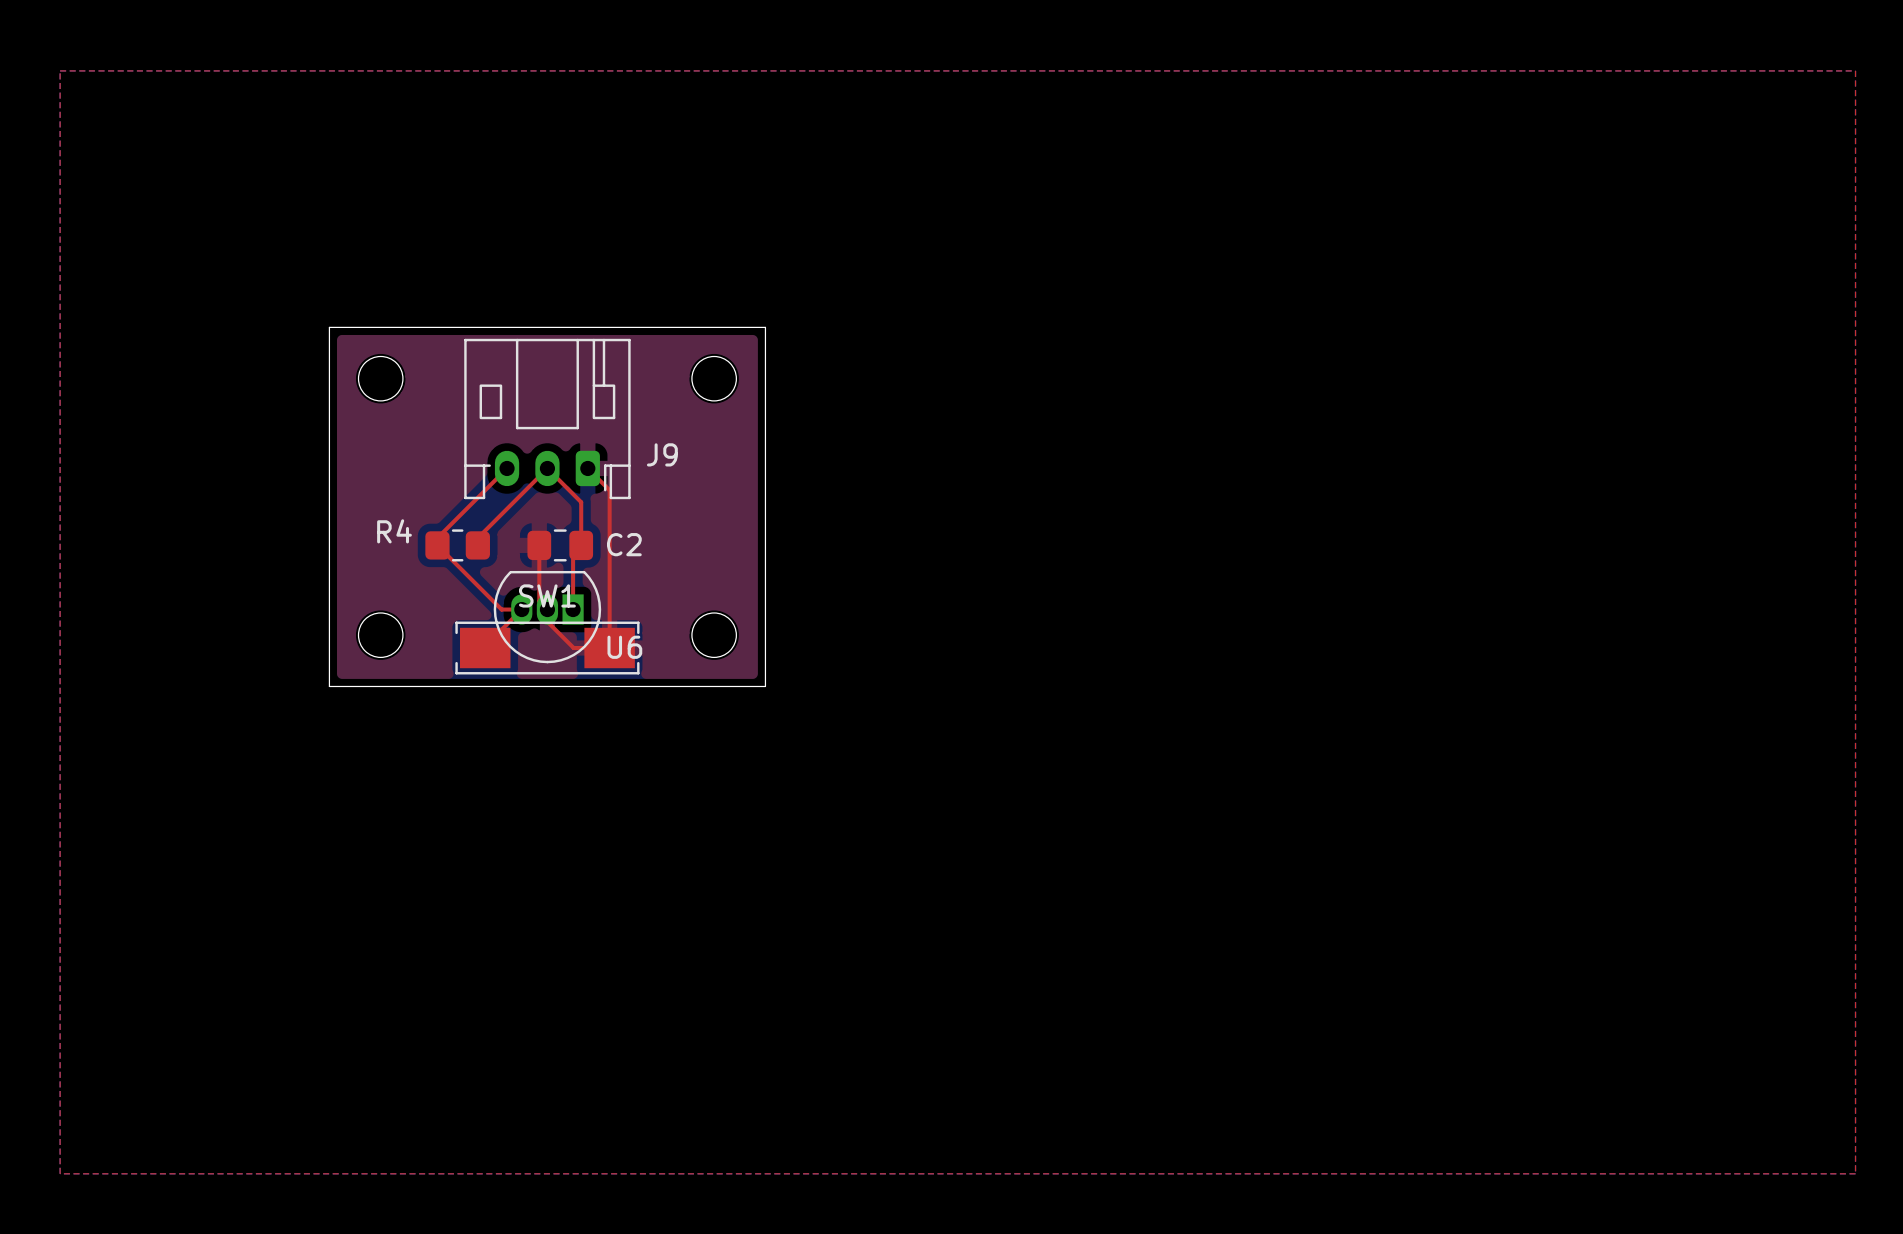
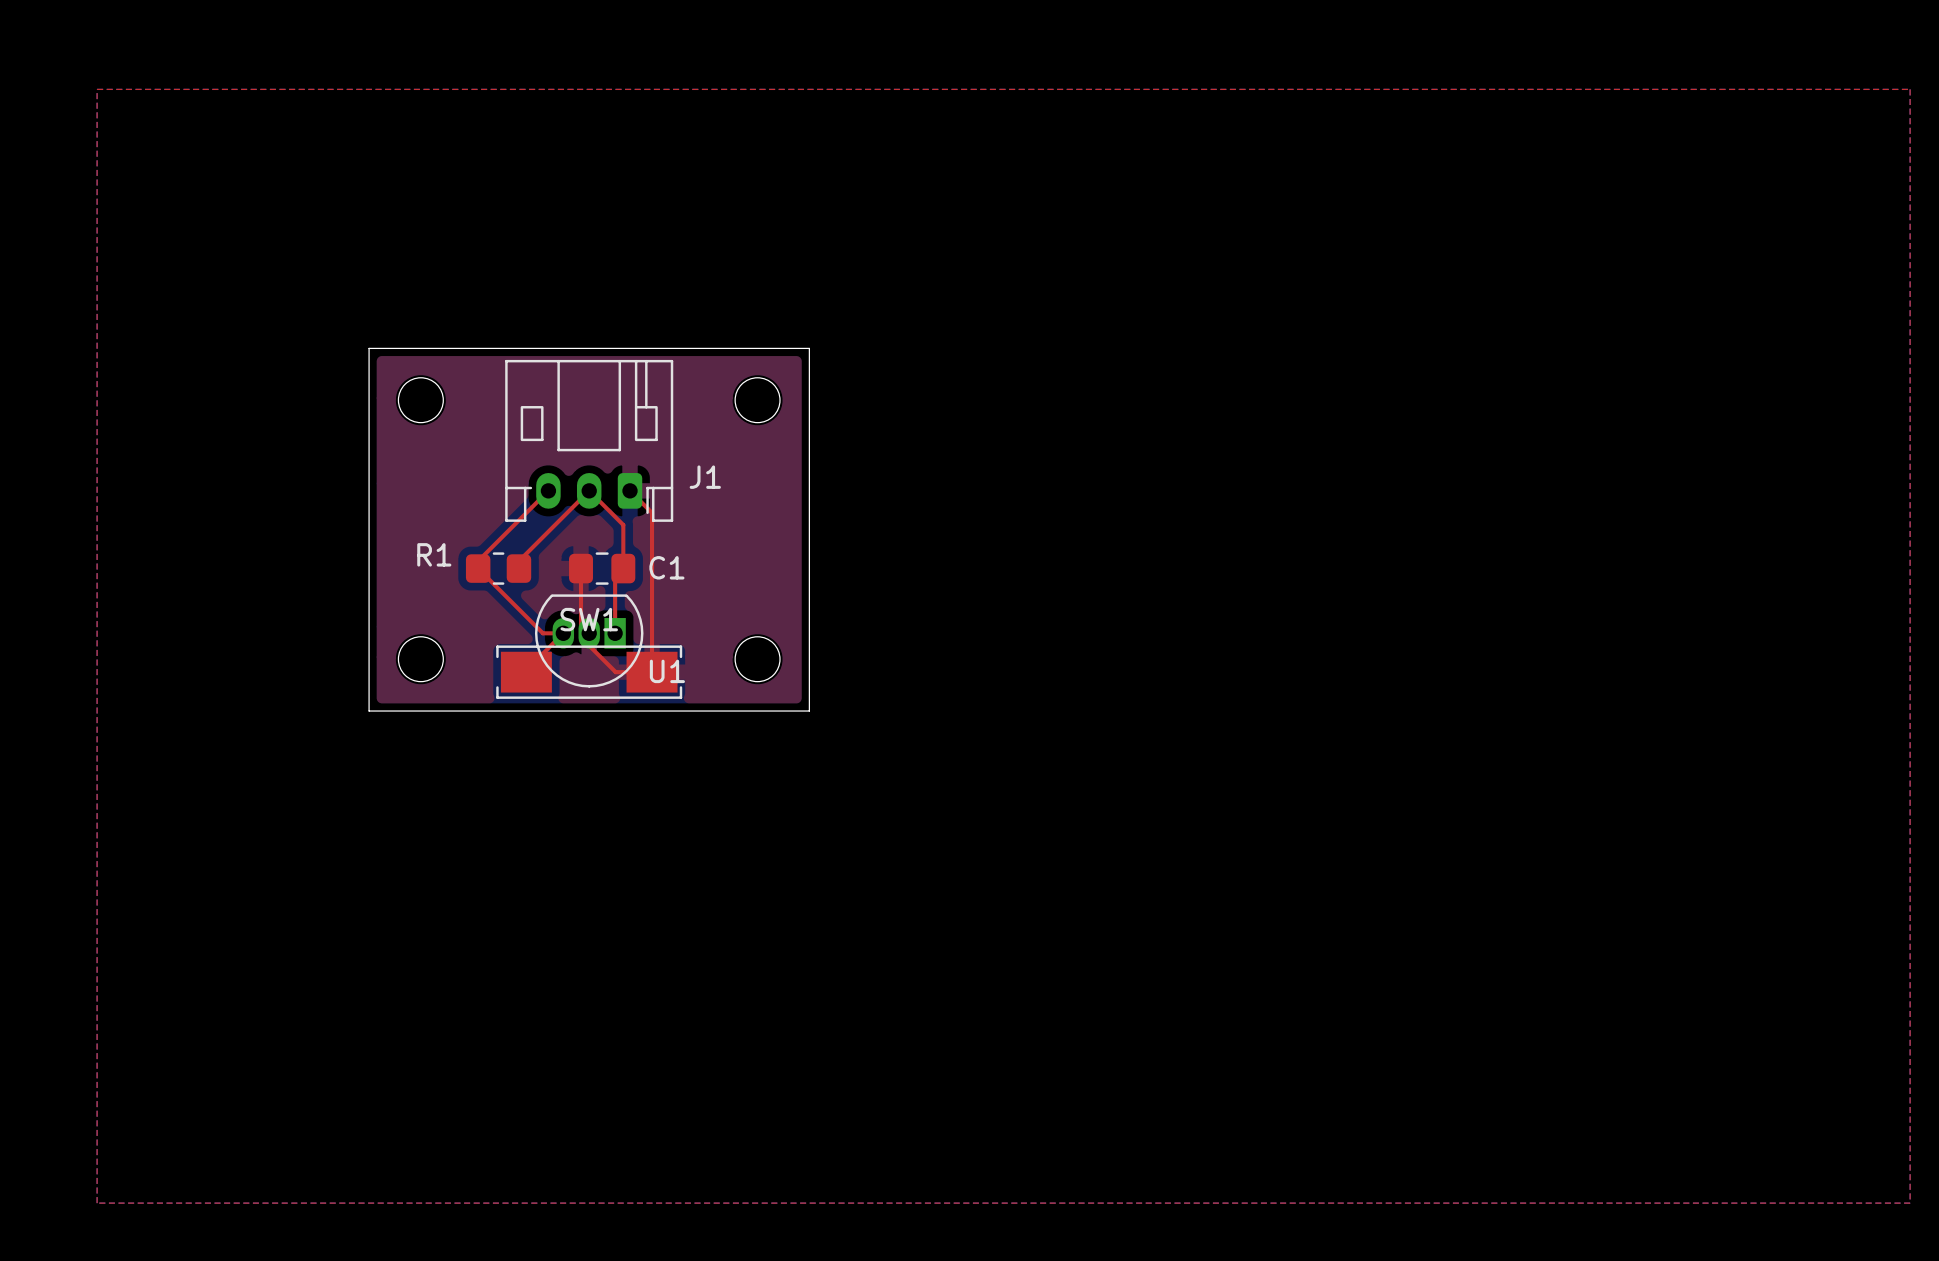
J9 name: J9 (662, 454) -> J1 (705, 477)
R4 name: R4 (394, 531) -> R1 (434, 554)
C2 name: C2 (624, 544) -> C1 (666, 567)
U6 name: U6 (624, 647) -> U1 (667, 671)

